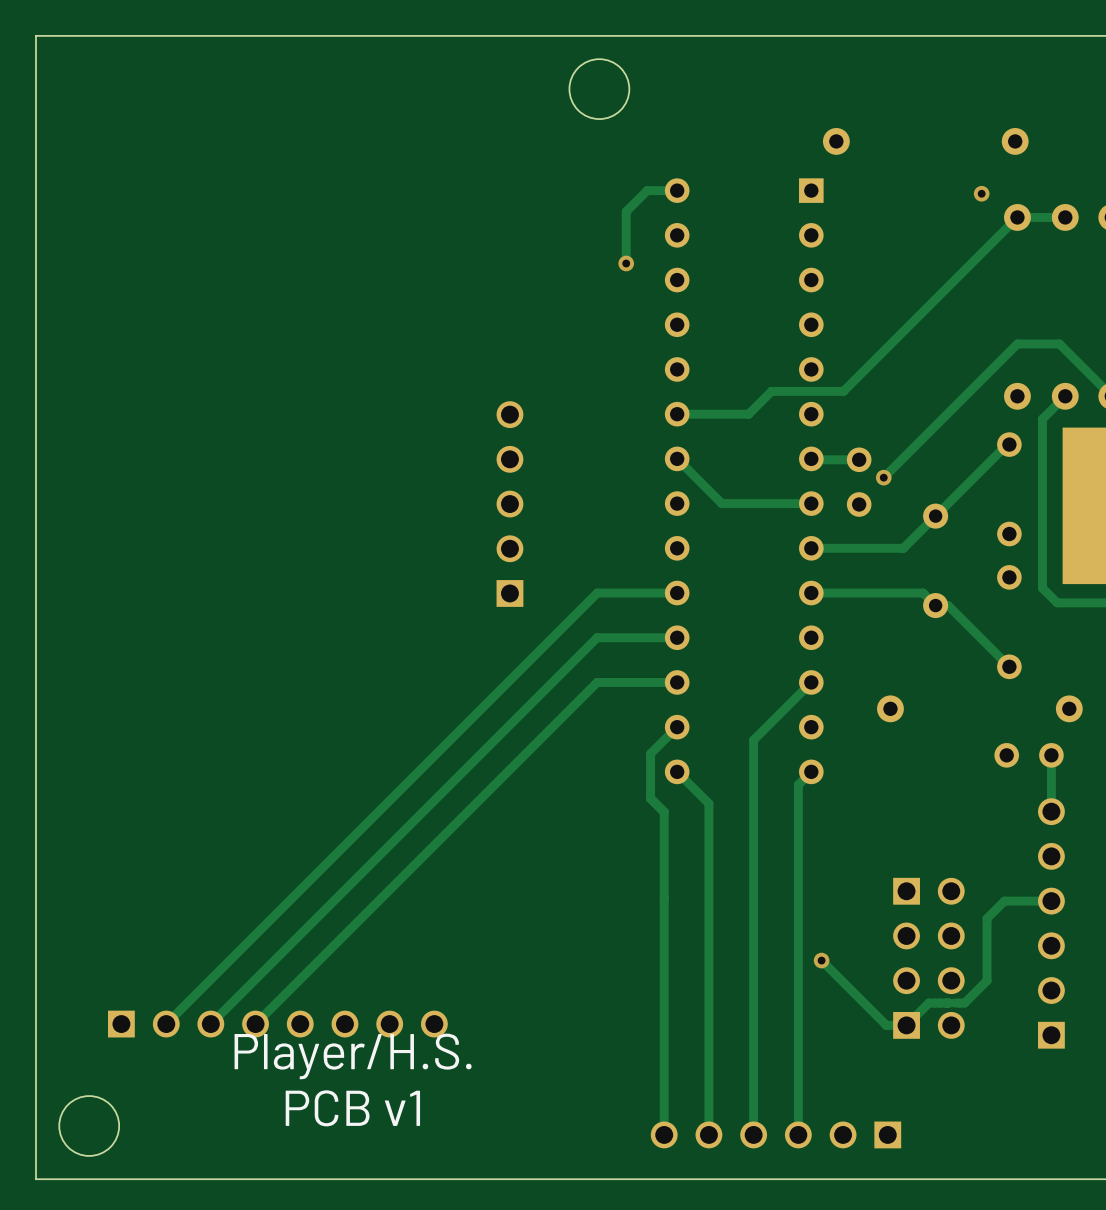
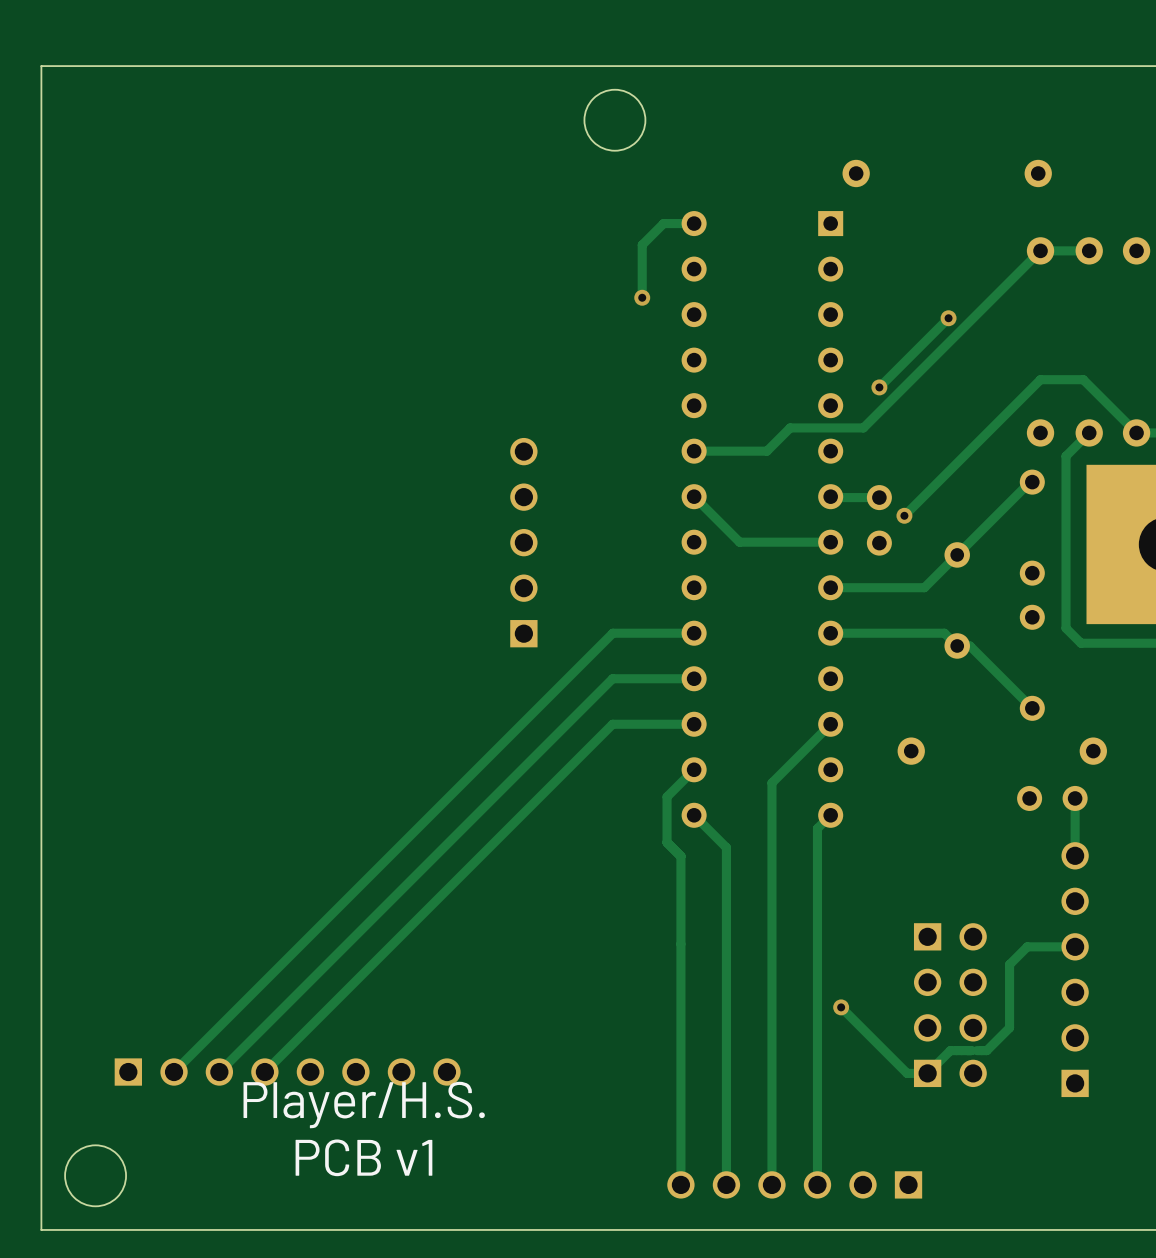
via: (981, 193) -> none
track: none -> (948, 318) (879, 387)
via: none -> (948, 318)
via: none -> (879, 387)

